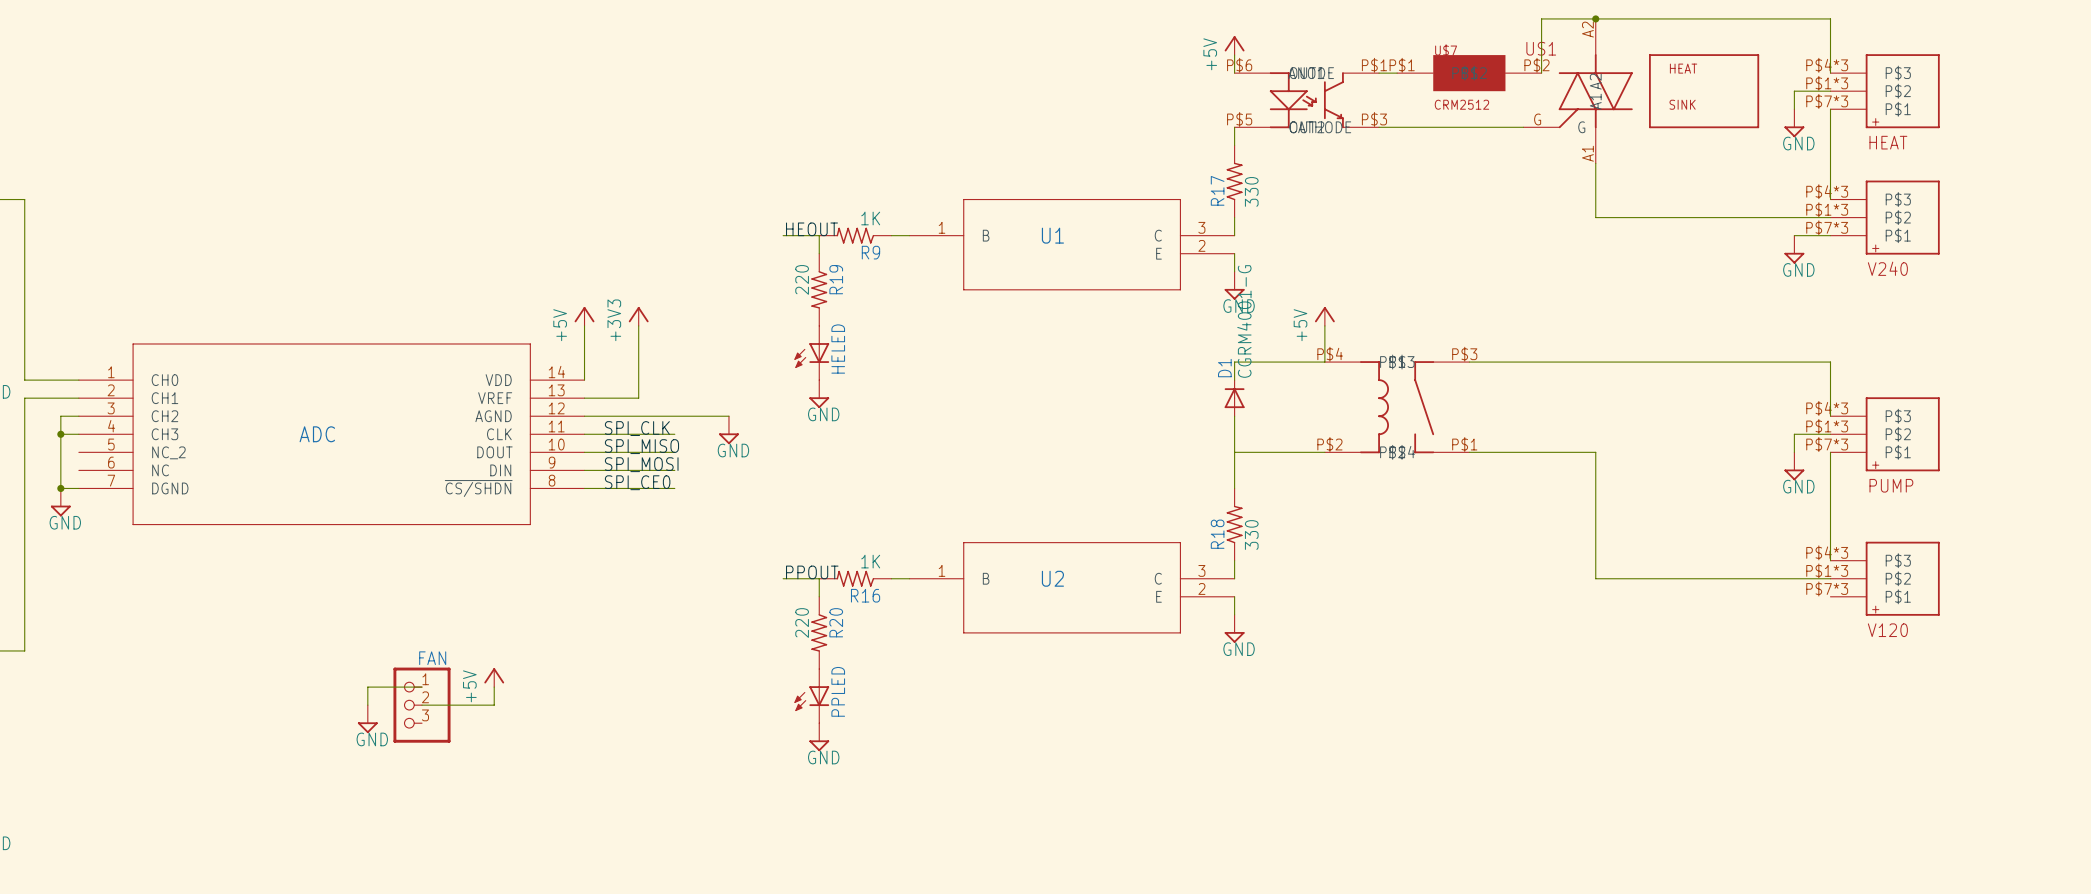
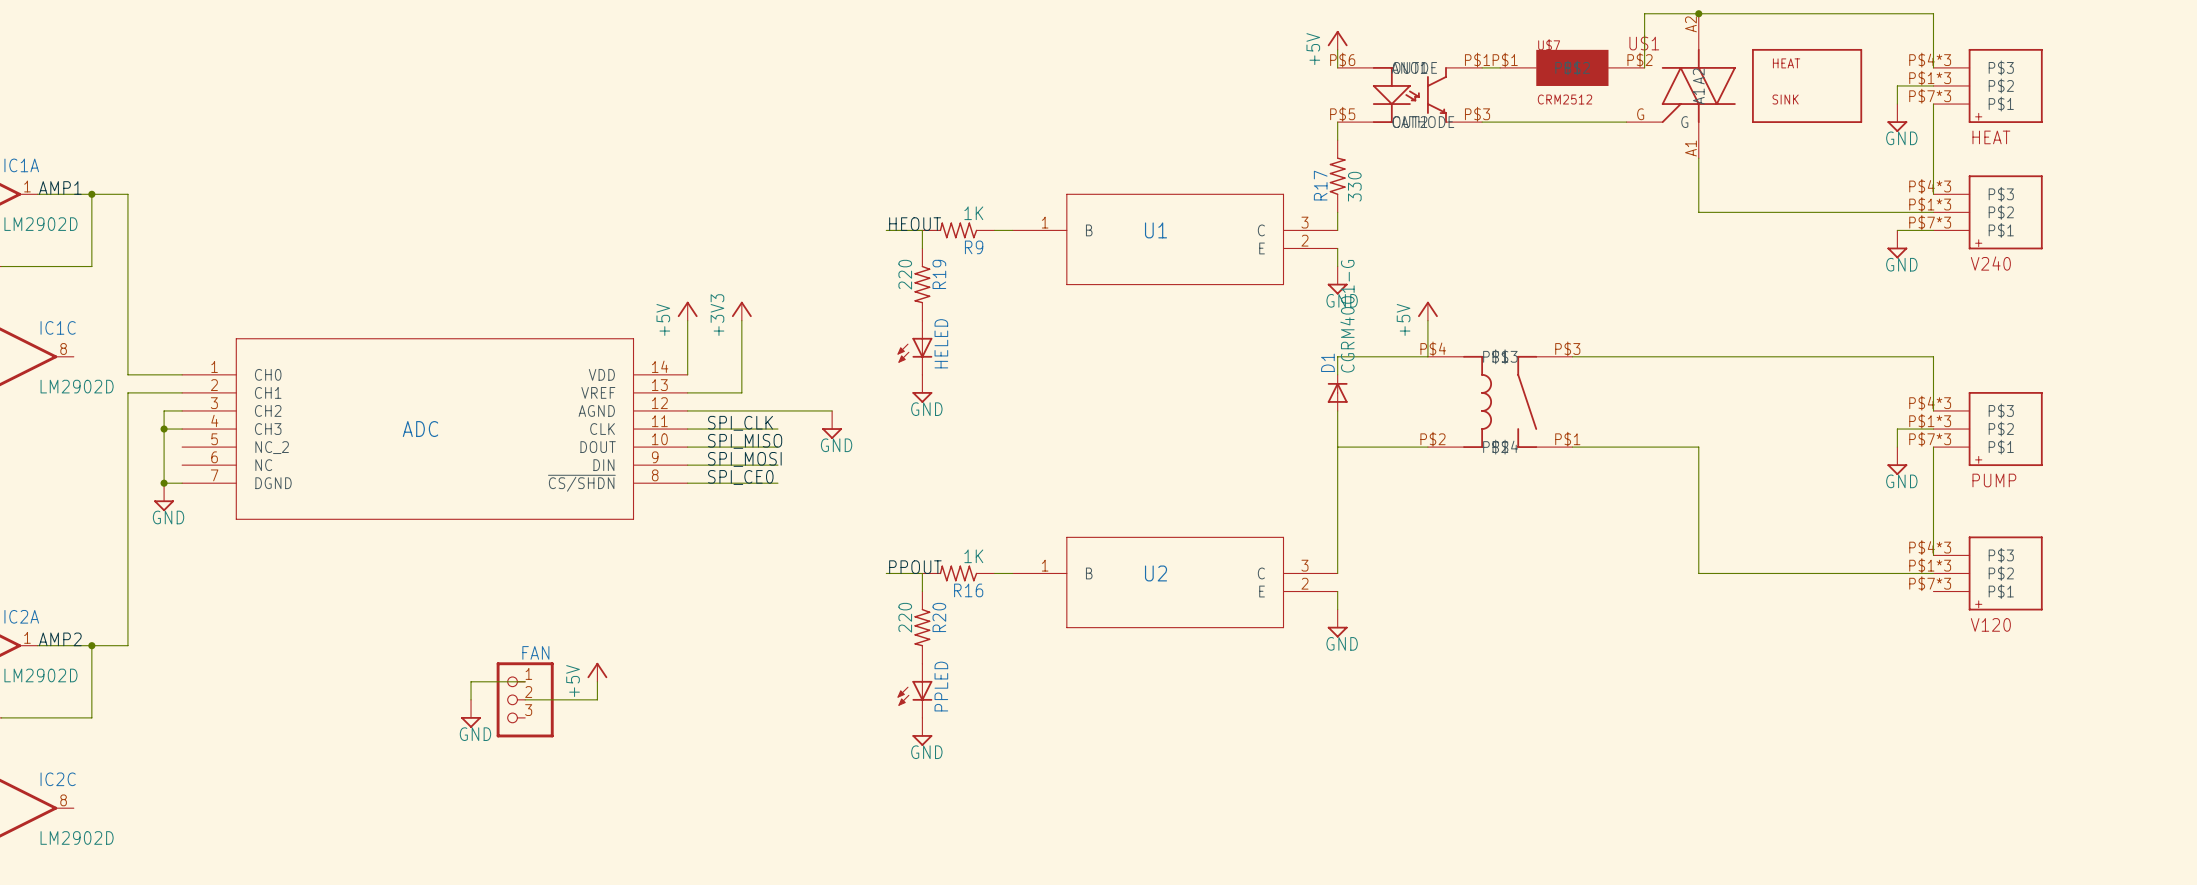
R18: 330 (1234, 524) -> none

